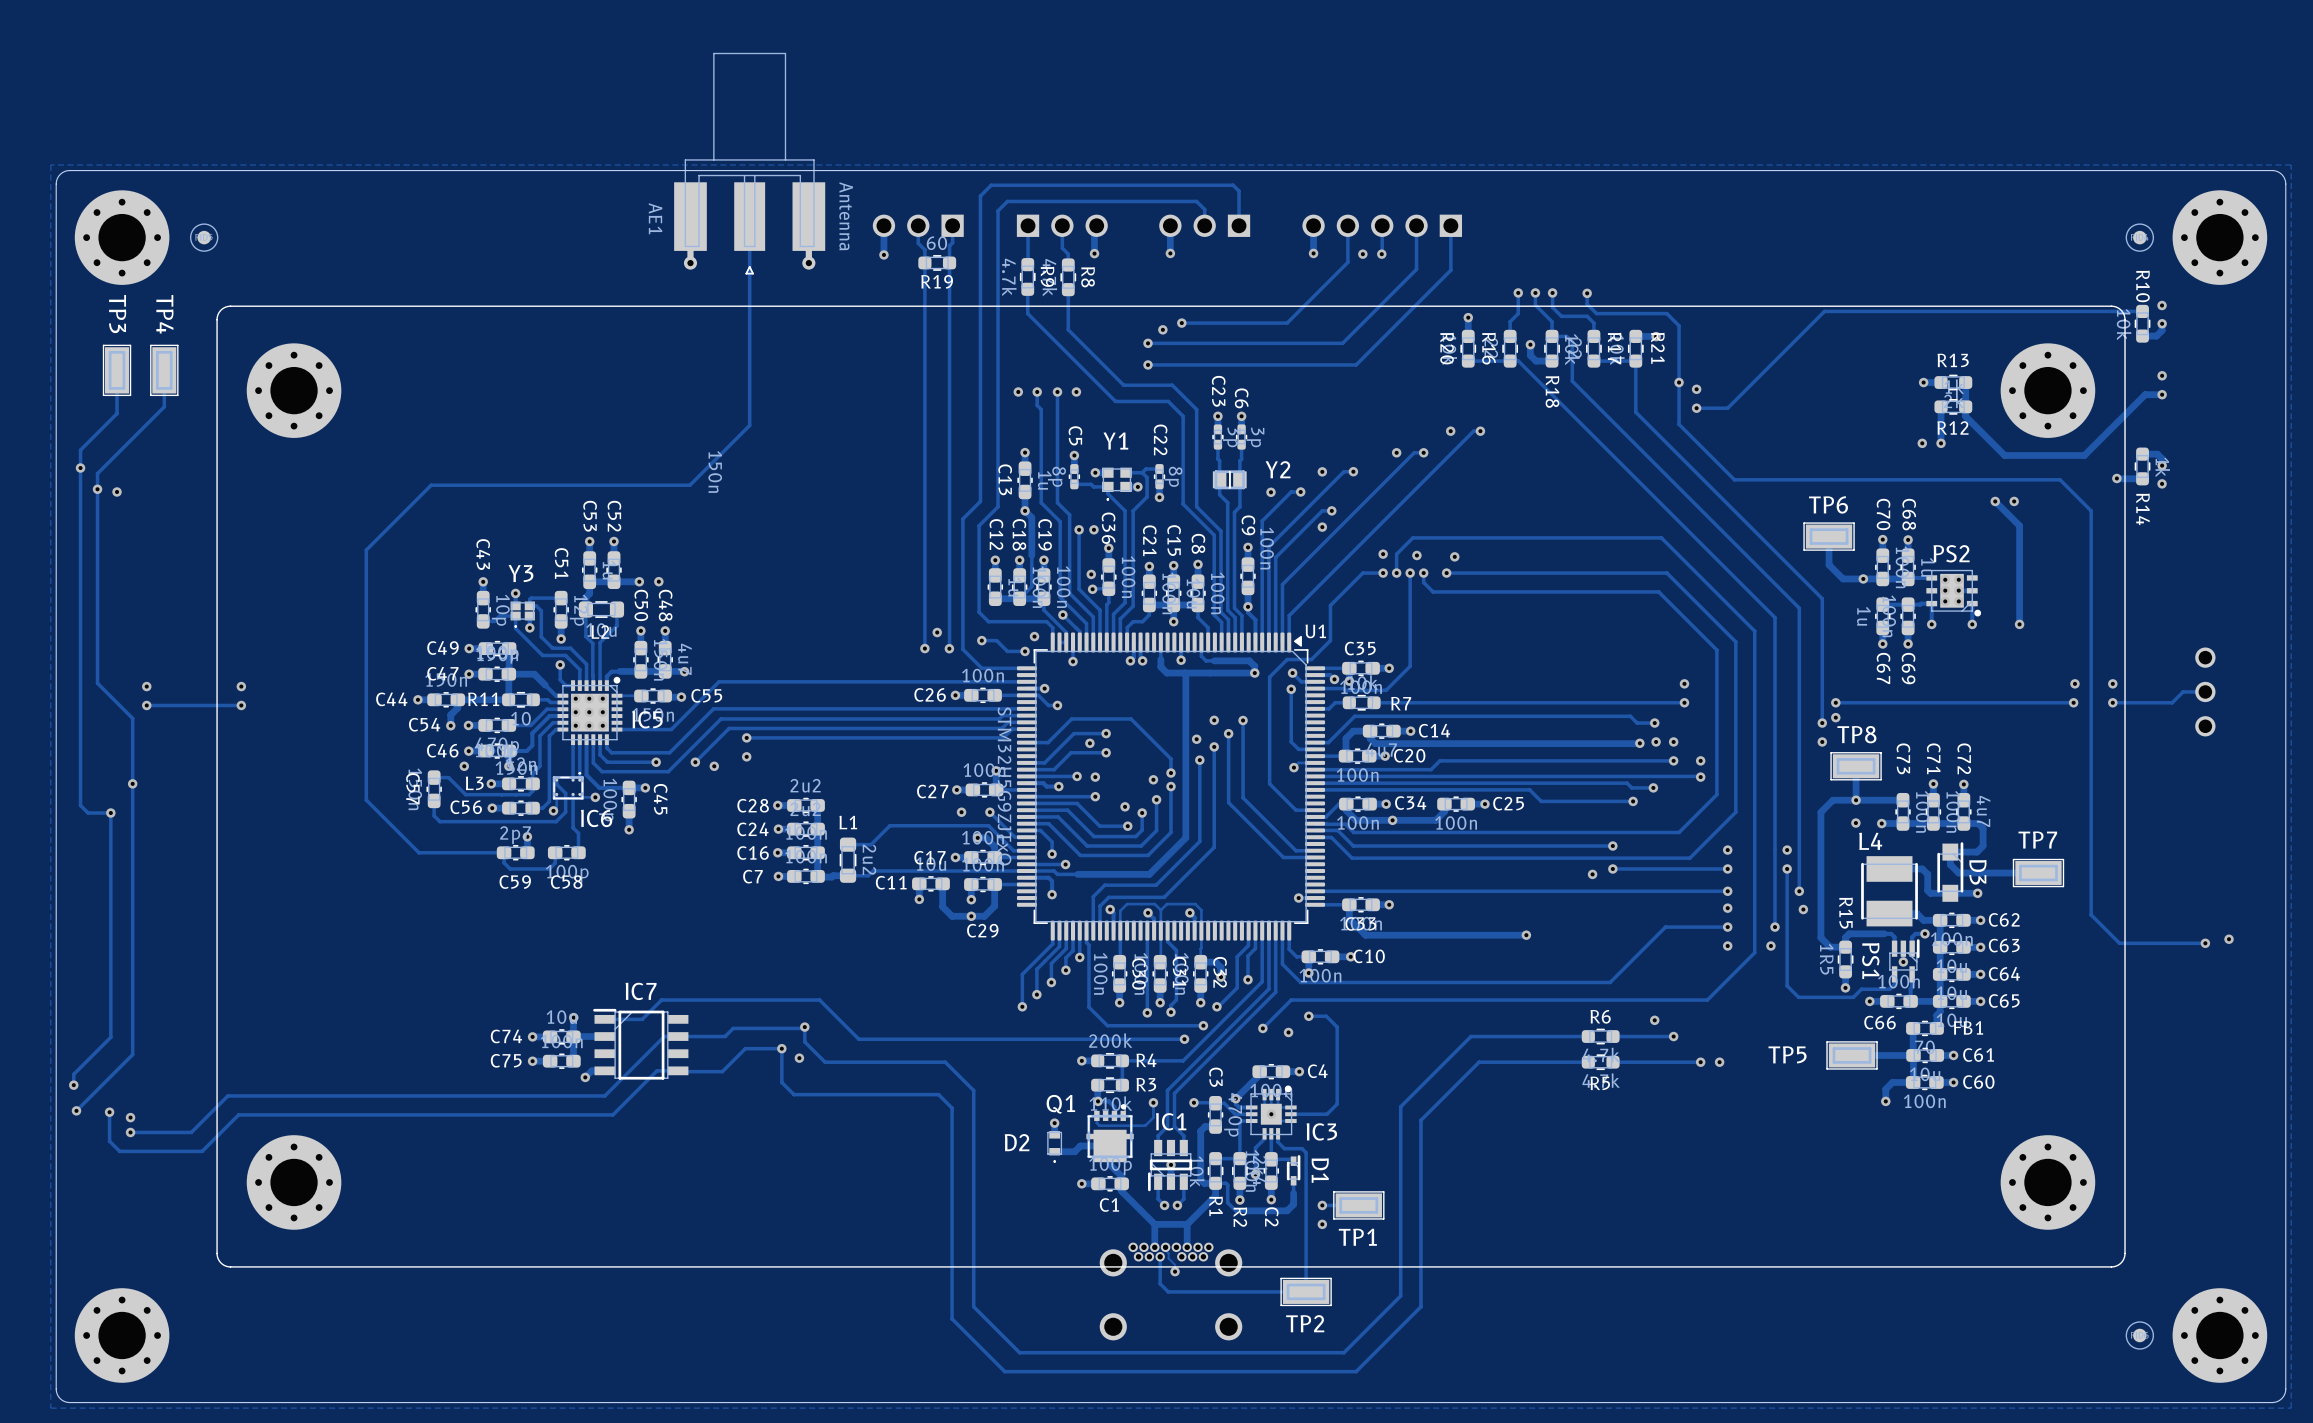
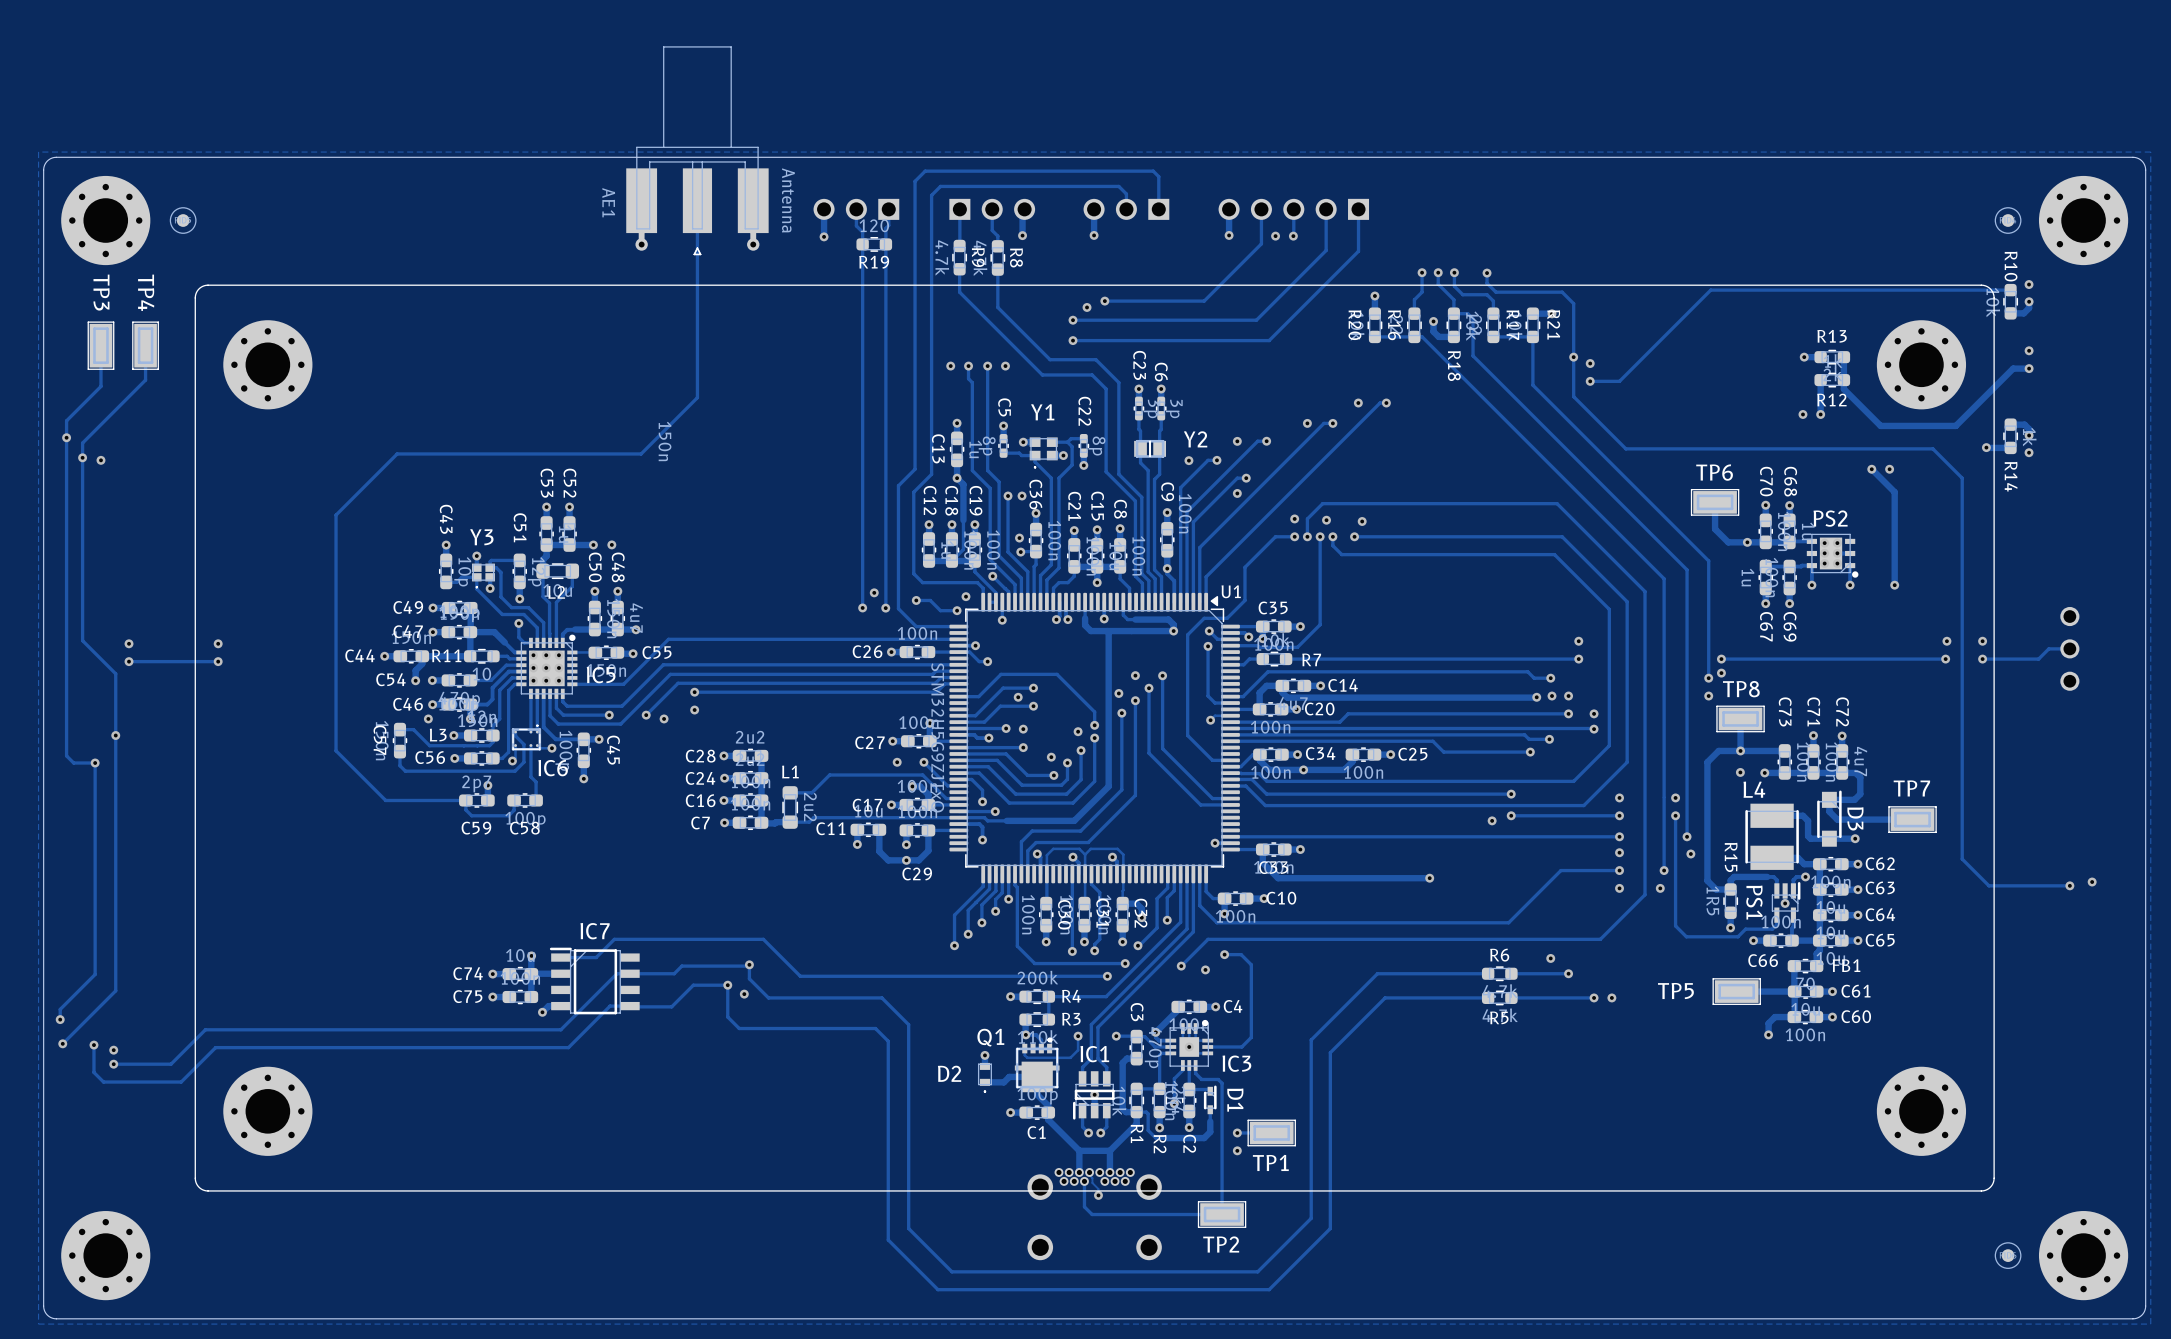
R19 value: 60 (936, 243) -> 120 (874, 225)

